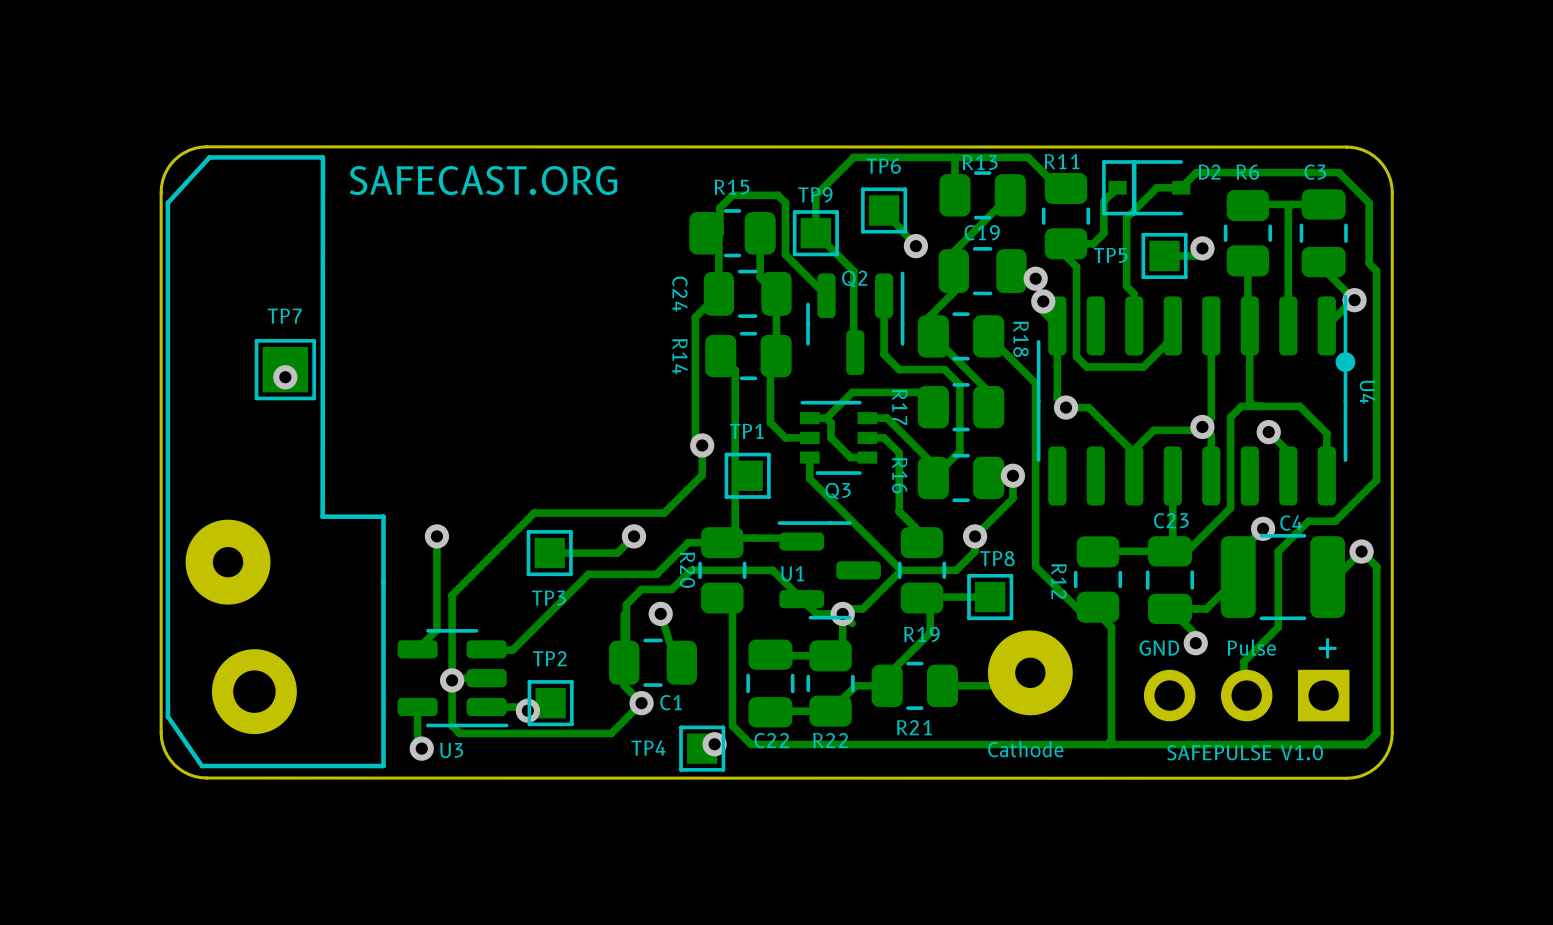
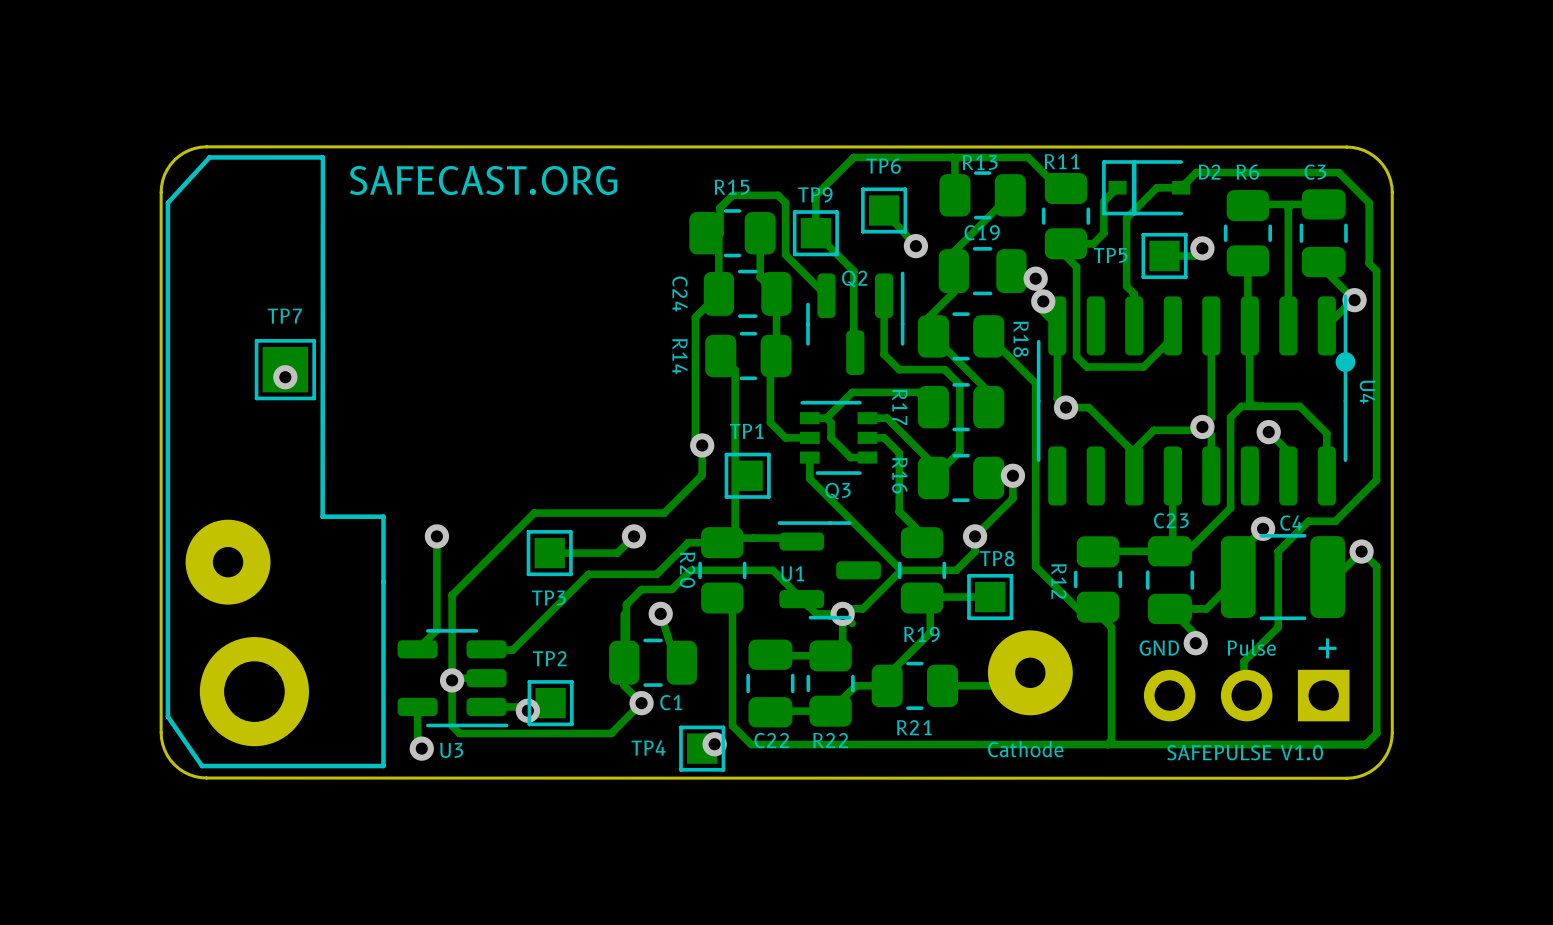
part footprint: [211, 649, 297, 735] -> [199, 637, 309, 747]

